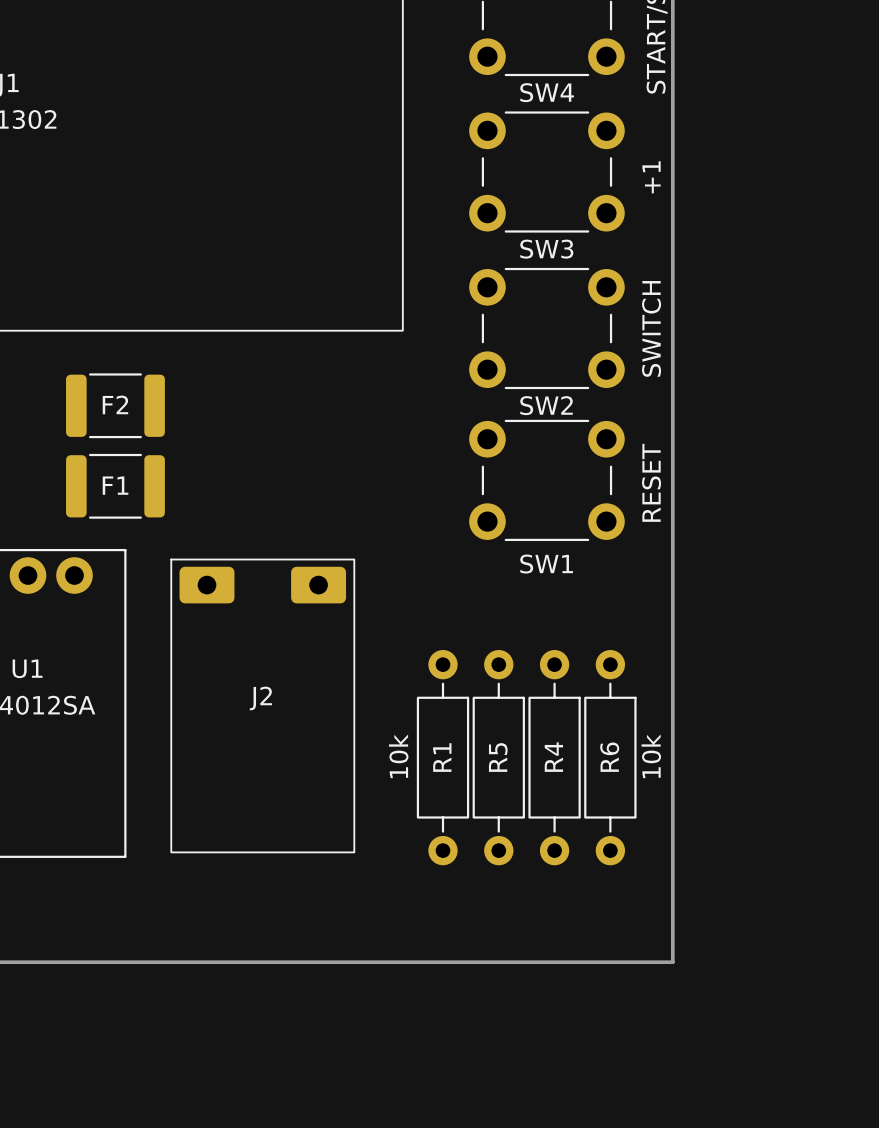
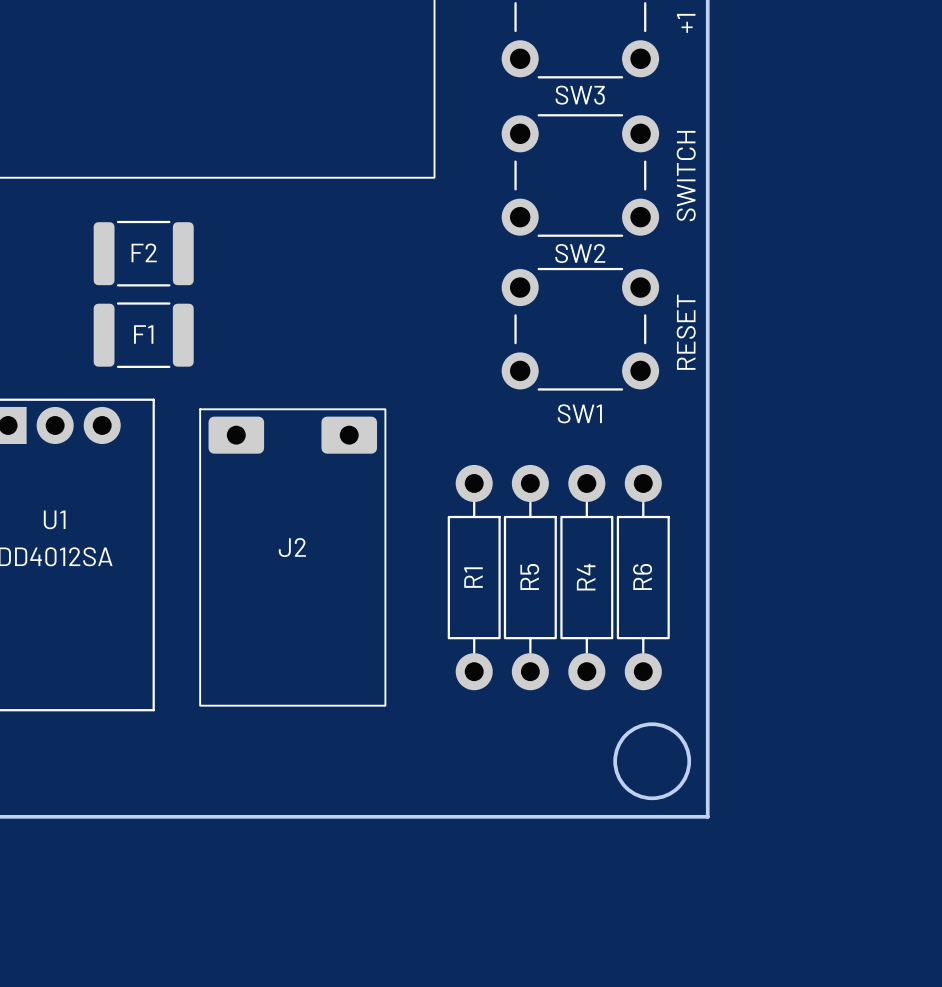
R1 footprint: [416, 650, 470, 866] -> [447, 464, 501, 691]
R5 footprint: [472, 650, 525, 866] -> [503, 464, 557, 691]
R4 footprint: [528, 650, 581, 866] -> [560, 464, 614, 691]
R6 footprint: [584, 650, 637, 866] -> [616, 464, 670, 691]
R1 value: 10k (398, 756) -> none
R6 value: 10k (651, 756) -> none
round board edge: none -> [613, 722, 692, 801]

